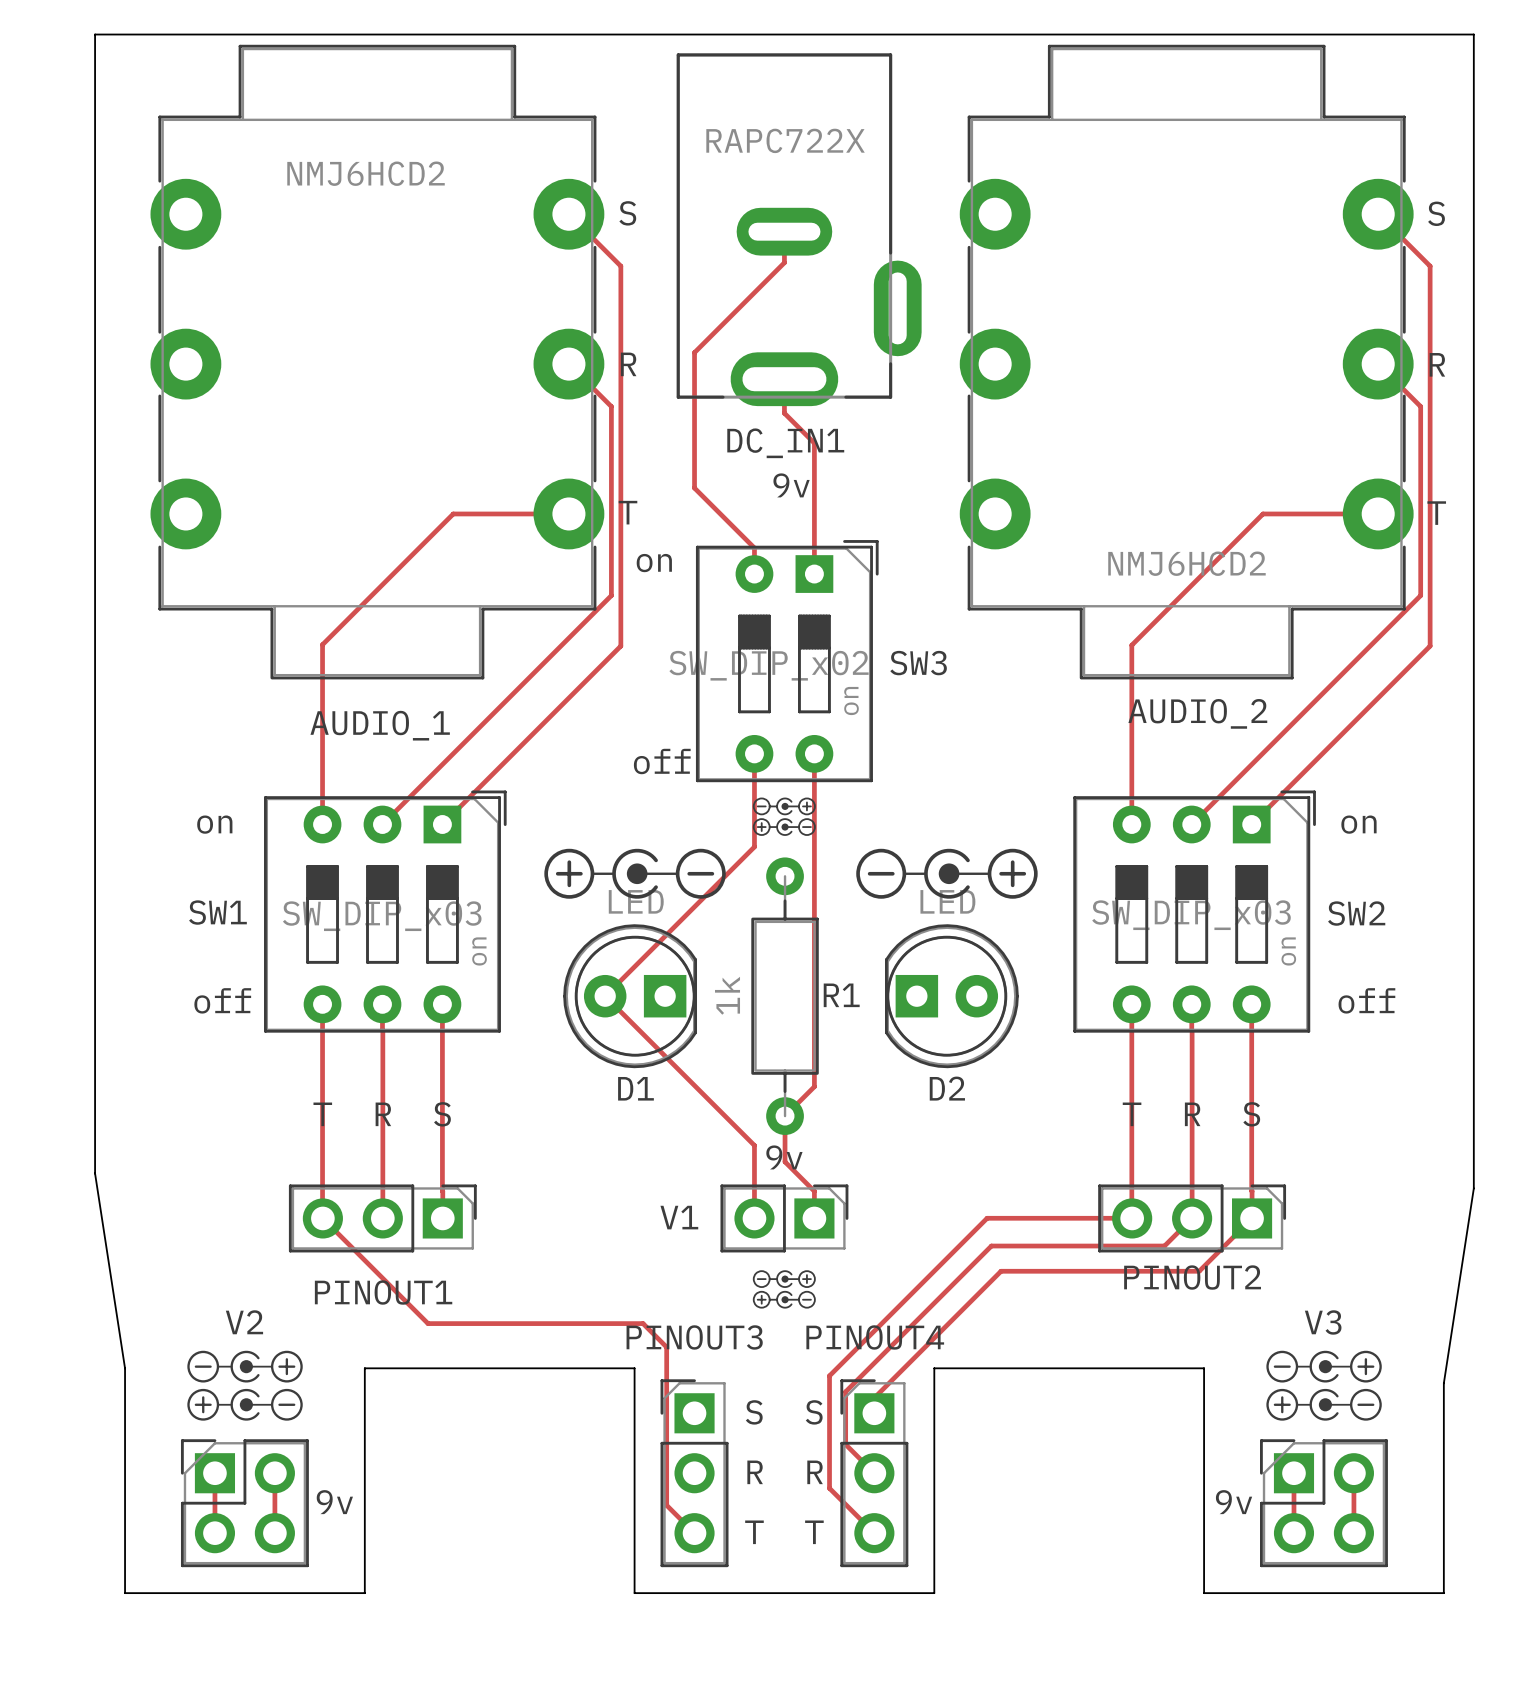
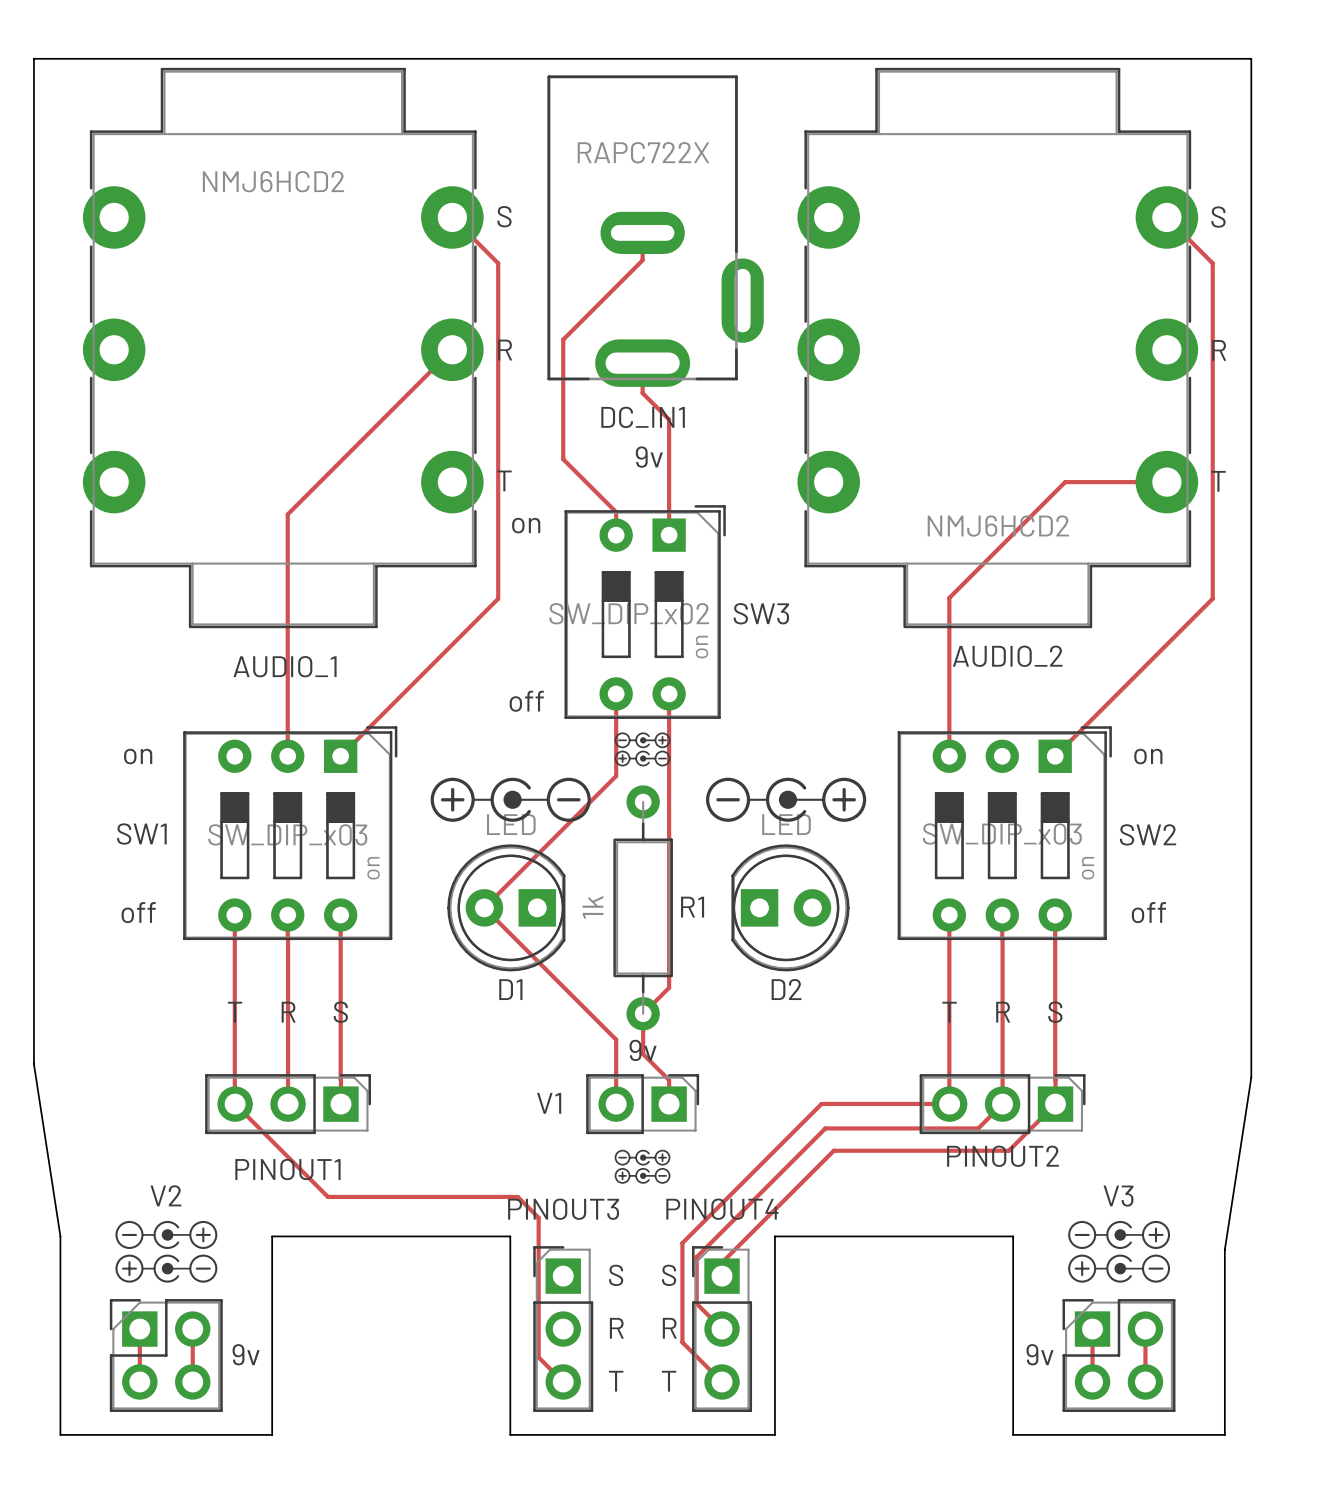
track: (568, 364) (611, 406) (611, 595) (382, 824) -> (452, 349) (287, 514) (287, 756)
track: (1378, 364) (1420, 406) (1420, 595) (1191, 824) -> none
track: (568, 513) (453, 513) (322, 644) (322, 824) -> none

